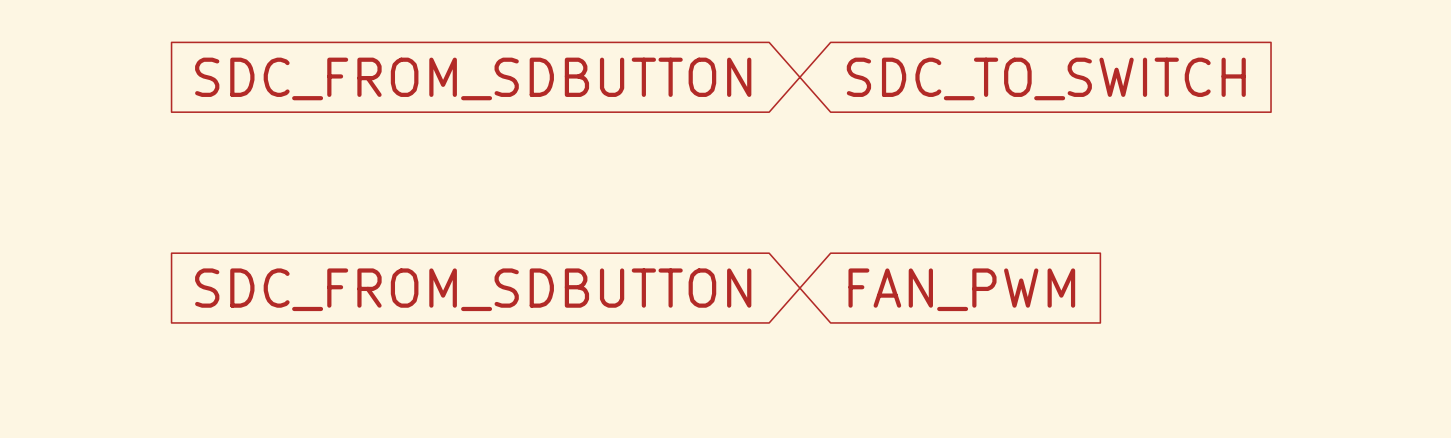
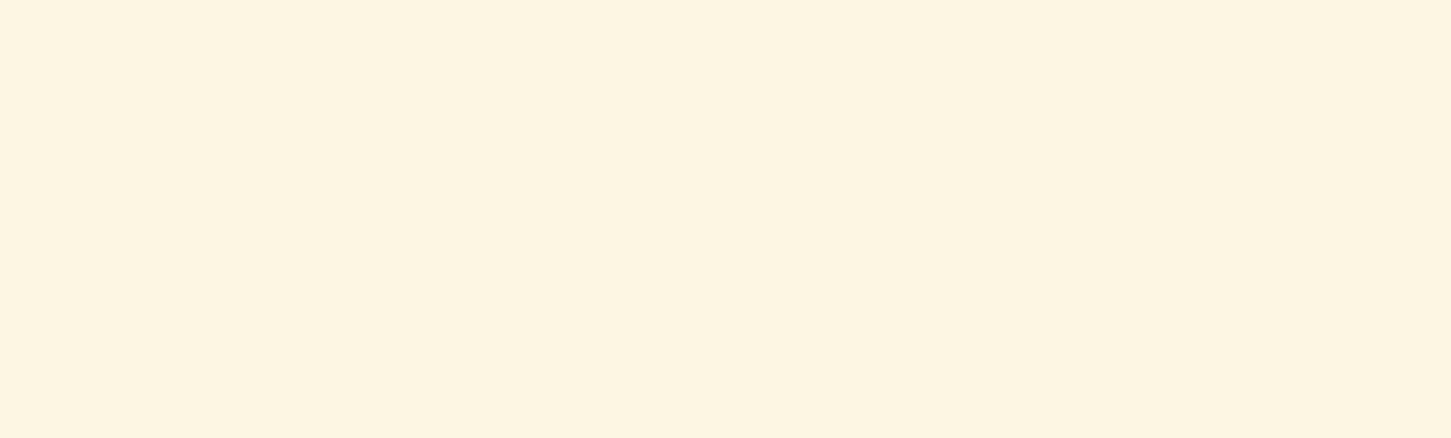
global label: SDC_FROM_SDBUTTON (473, 78) -> none
global label: SDC_TO_SWITCH (1046, 78) -> none
global label: SDC_FROM_SDBUTTON (473, 289) -> none
global label: FAN_PWM (961, 289) -> none

